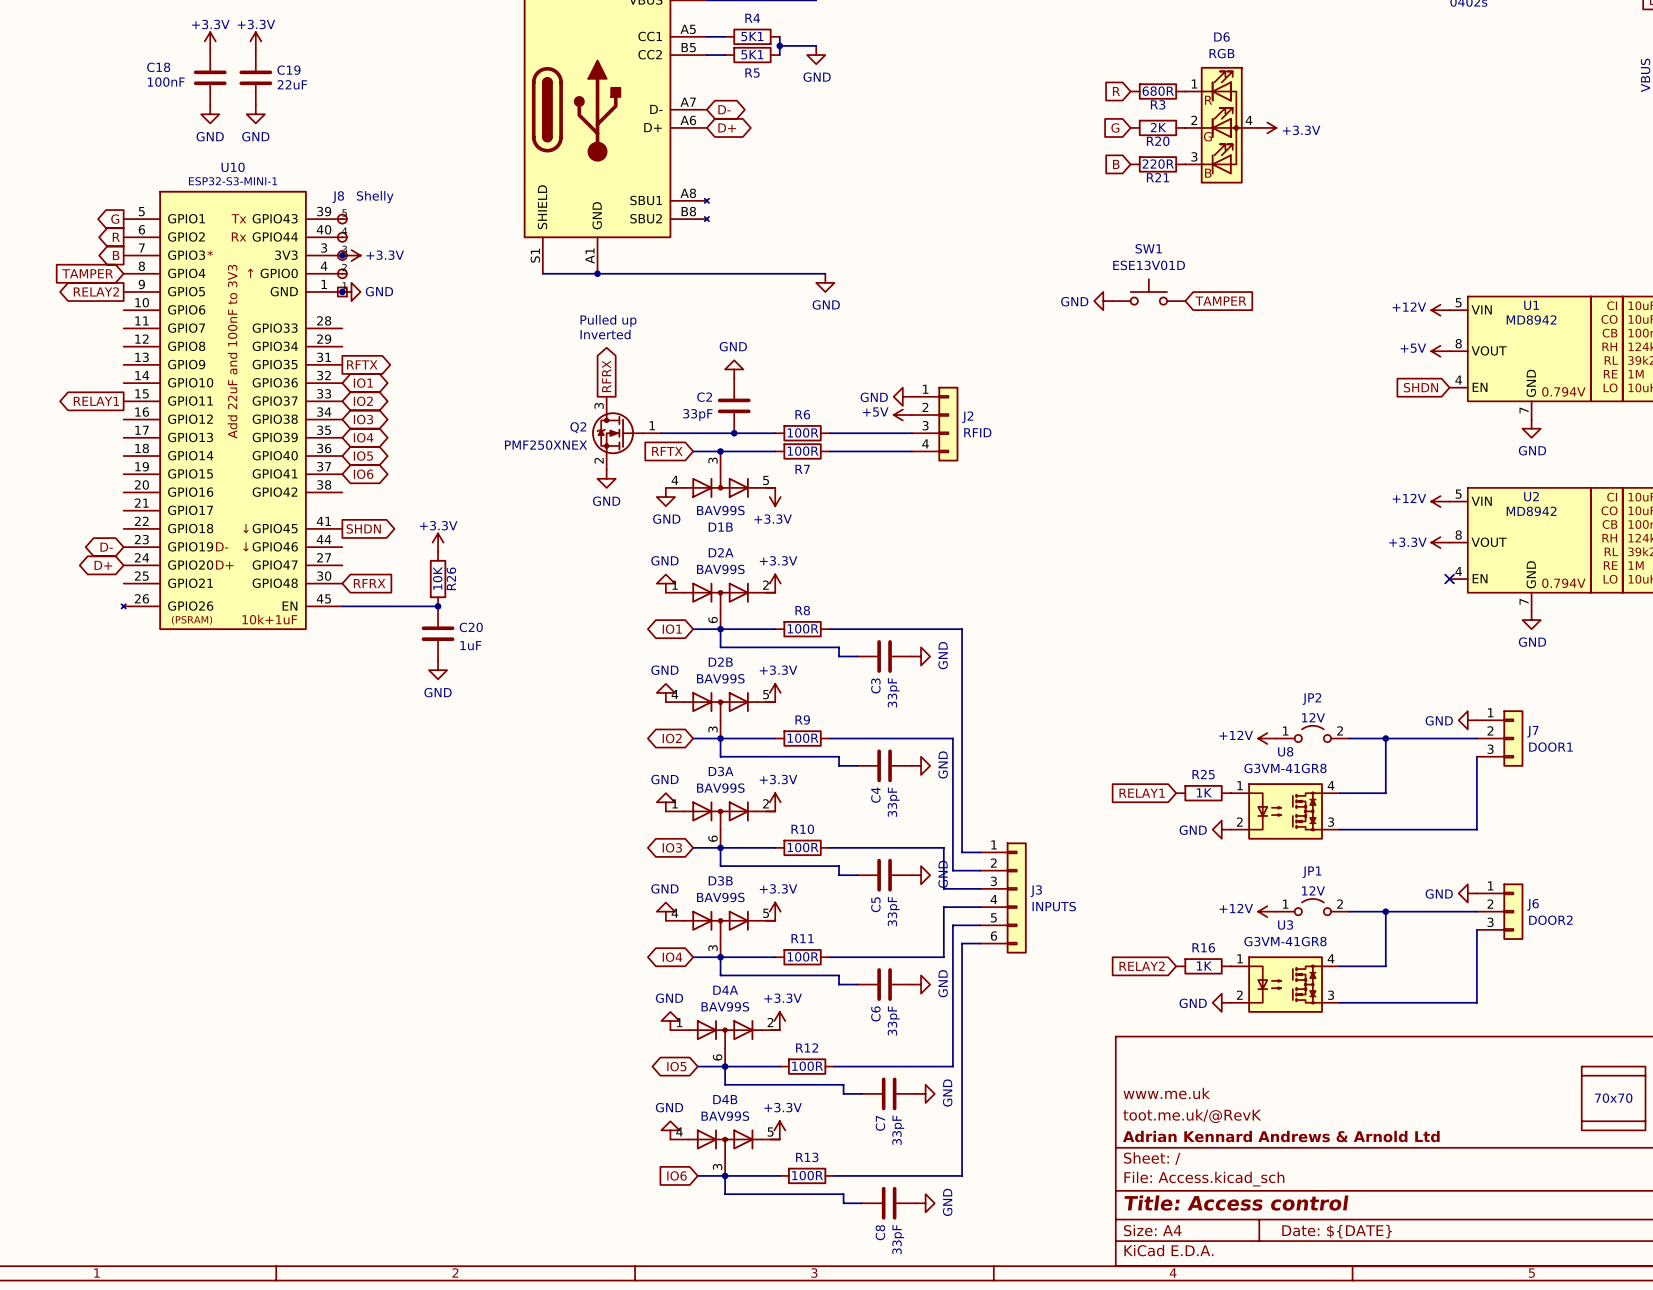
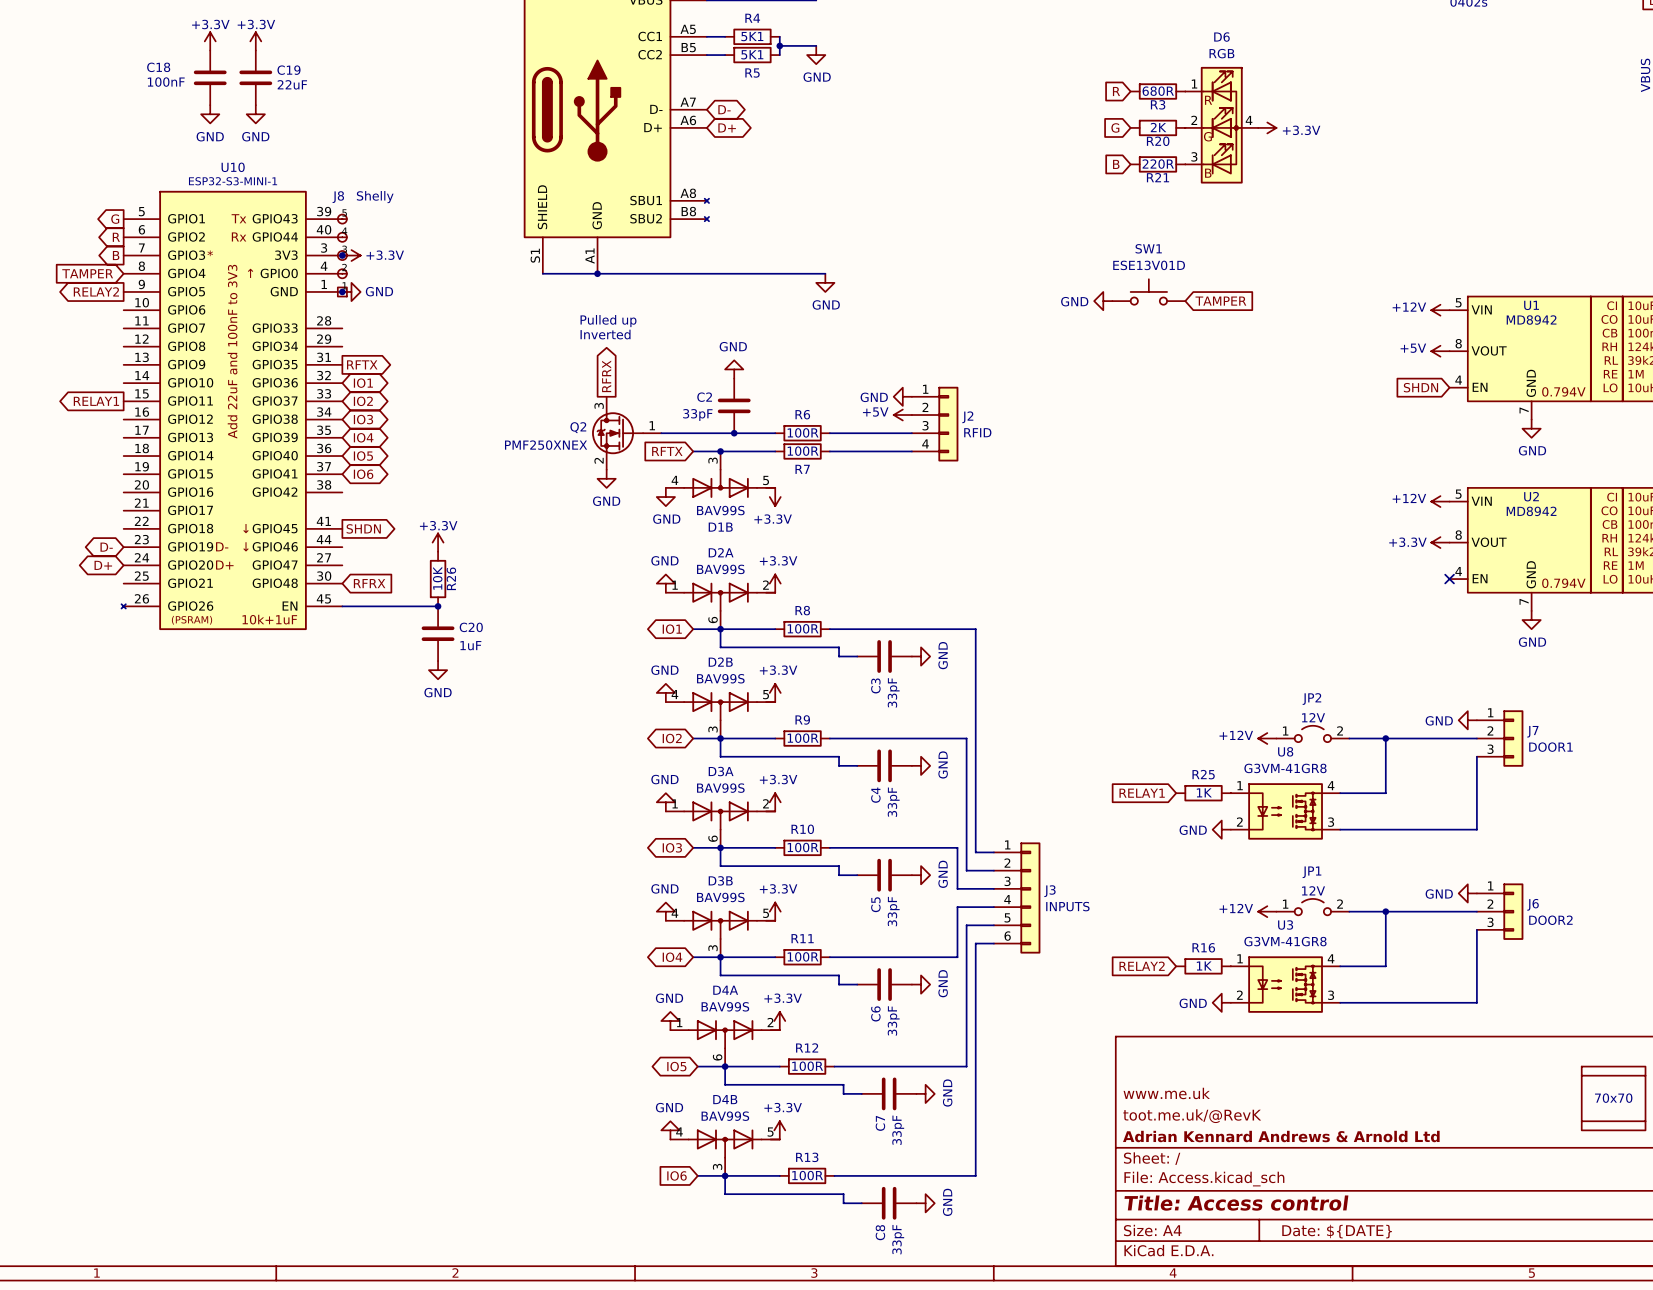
wire: (962, 629) (962, 852) (975, 852) -> (962, 629) (975, 629) (975, 852)
wire: (952, 738) (952, 870) (966, 870) -> (952, 738) (966, 738) (966, 870)
wire: (943, 847) (943, 888) (957, 888) -> (943, 847) (957, 847) (957, 888)
J3 position: (1003, 897) -> (1017, 897)
wire: (957, 907) (943, 907) (943, 957) -> (957, 907) (957, 957) (943, 957)
wire: (966, 925) (952, 925) (952, 1066) -> (966, 925) (966, 1066) (952, 1066)
wire: (975, 943) (962, 943) (962, 1175) -> (975, 943) (975, 1175) (962, 1175)

